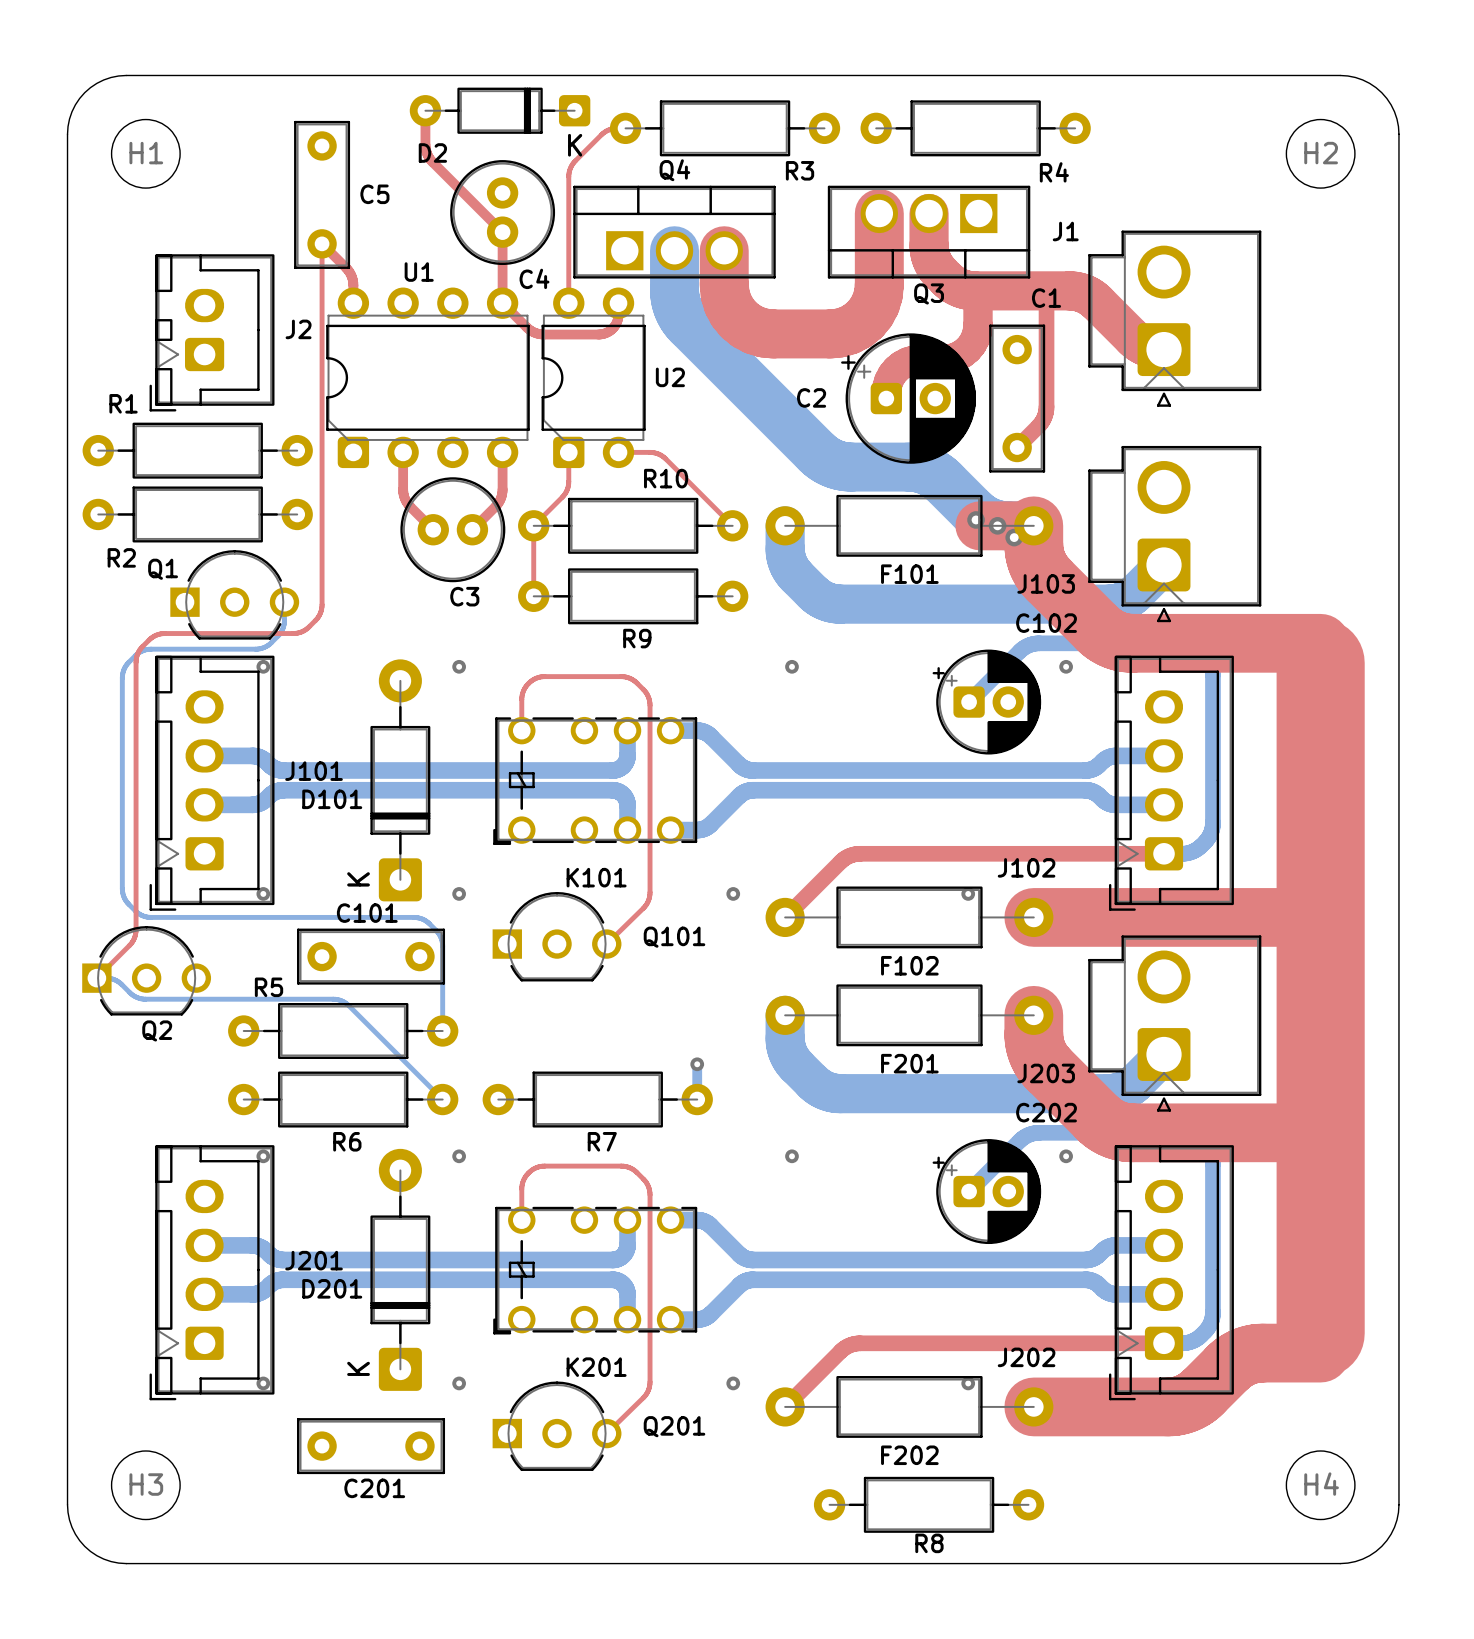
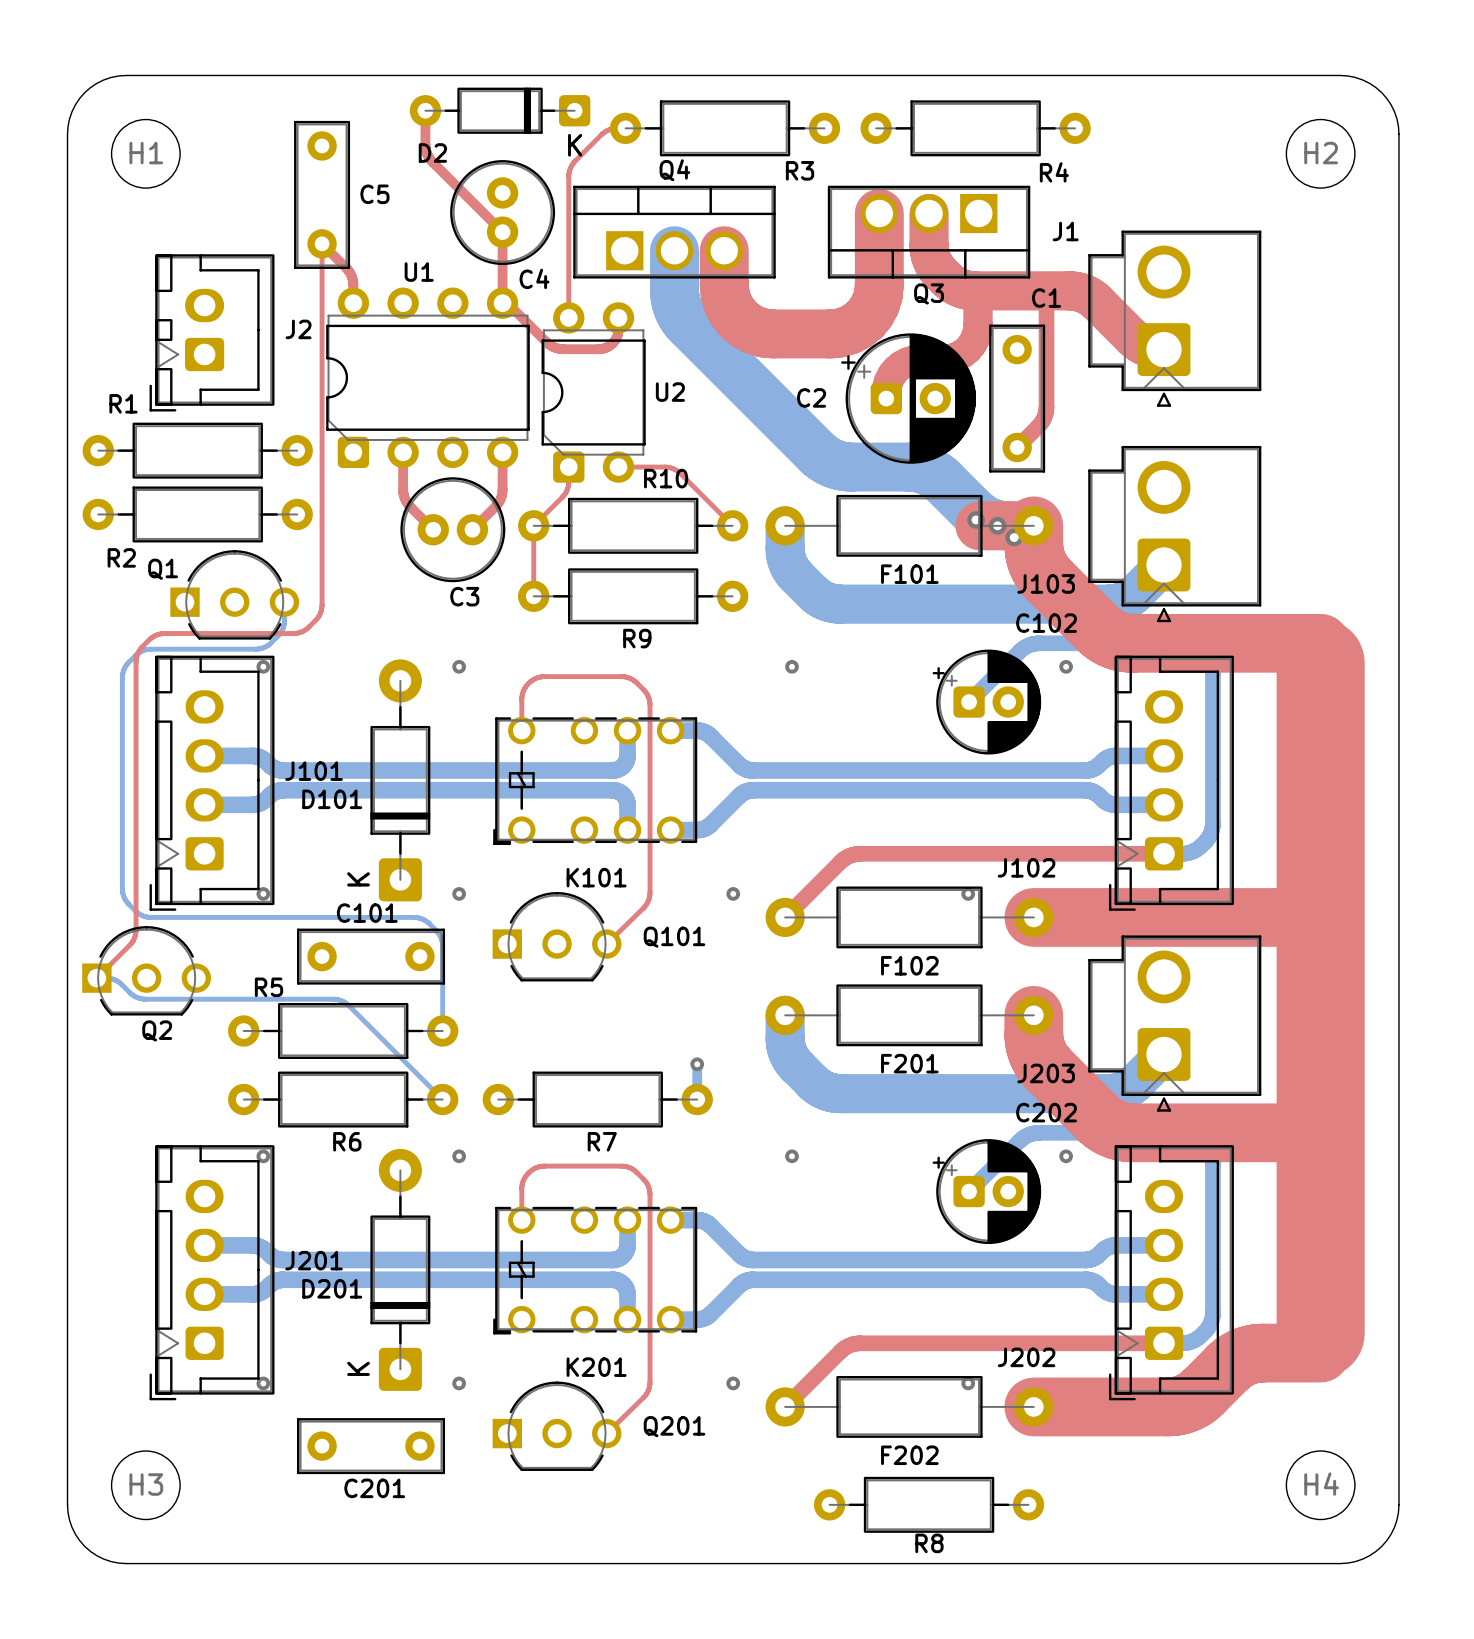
top track: (502, 298) (502, 303) (528, 328) (544, 334) (606, 333) (612, 328) (616, 322) (618, 303) -> (502, 298) (548, 343) (558, 348) (598, 349) (607, 346) (616, 336) (618, 317)
U2 position: (593, 377) -> (593, 392)
top track: (618, 452) (656, 453) (664, 457) (680, 473) -> (618, 467) (666, 467) (680, 473)

